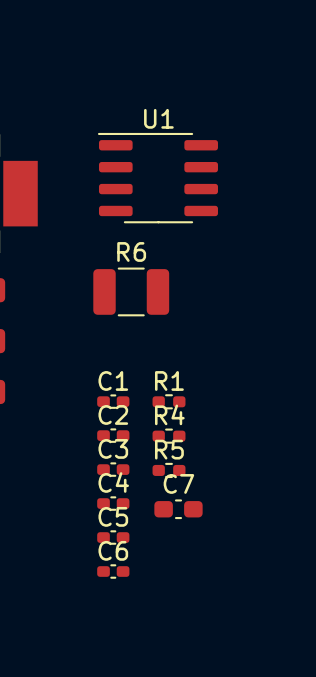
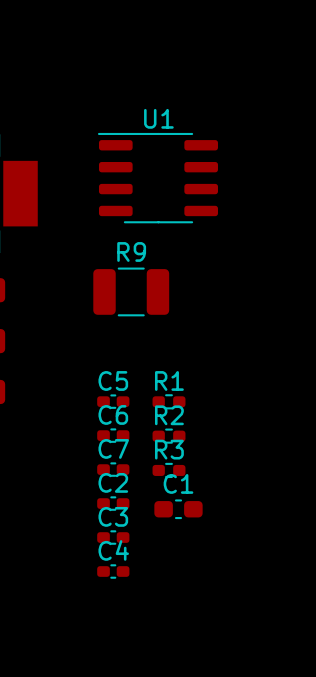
R6 name: R6 (131, 251) -> R9 (131, 251)
C1 name: C1 (113, 380) -> C5 (113, 380)
C2 name: C2 (113, 414) -> C6 (113, 414)
R4 name: R4 (169, 414) -> R2 (169, 415)
C3 name: C3 (113, 448) -> C7 (113, 448)
R5 name: R5 (169, 449) -> R3 (169, 449)
C4 name: C4 (113, 482) -> C2 (113, 482)
C7 name: C7 (178, 483) -> C1 (178, 483)
C5 name: C5 (113, 516) -> C3 (113, 516)
C6 name: C6 (113, 550) -> C4 (113, 550)

